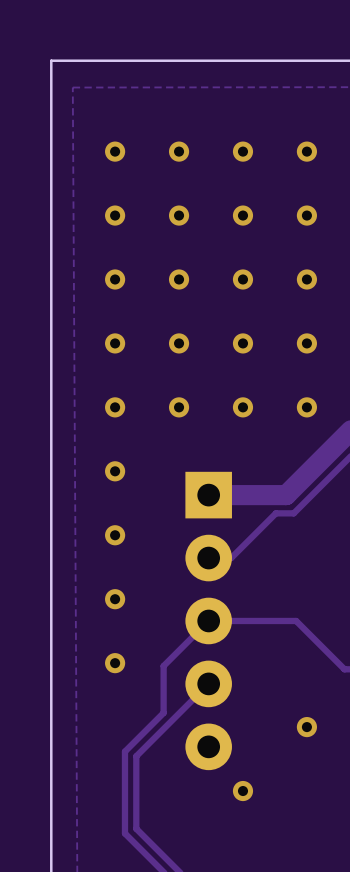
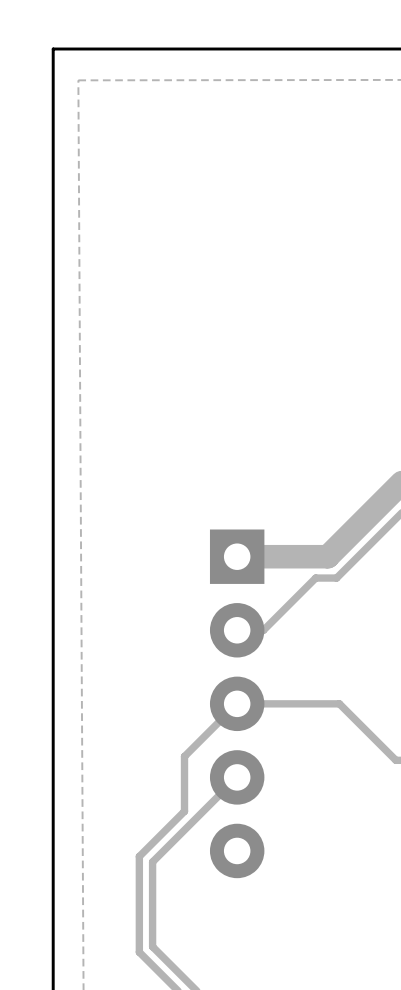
via: (115, 151) -> none
via: (179, 151) -> none
via: (242, 151) -> none
via: (306, 151) -> none
via: (115, 215) -> none
via: (179, 215) -> none
via: (242, 215) -> none
via: (306, 215) -> none
via: (115, 279) -> none
via: (179, 279) -> none
via: (242, 279) -> none
via: (306, 279) -> none
via: (115, 343) -> none
via: (179, 343) -> none
via: (242, 343) -> none
via: (306, 343) -> none
via: (115, 407) -> none
via: (179, 407) -> none
via: (242, 407) -> none
via: (306, 407) -> none
via: (115, 471) -> none
via: (115, 535) -> none
via: (115, 599) -> none
via: (115, 663) -> none
via: (306, 727) -> none
via: (242, 791) -> none

